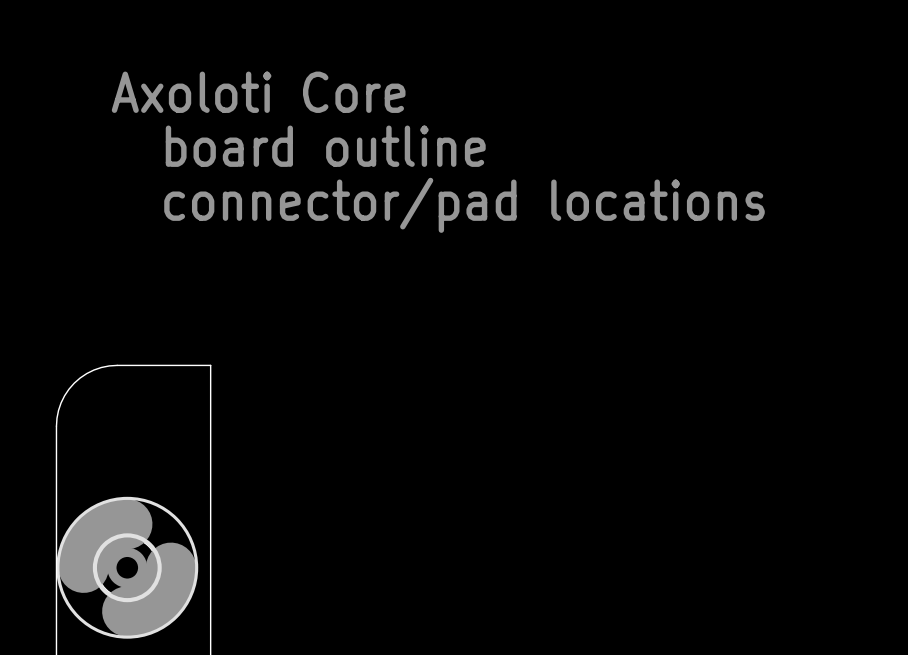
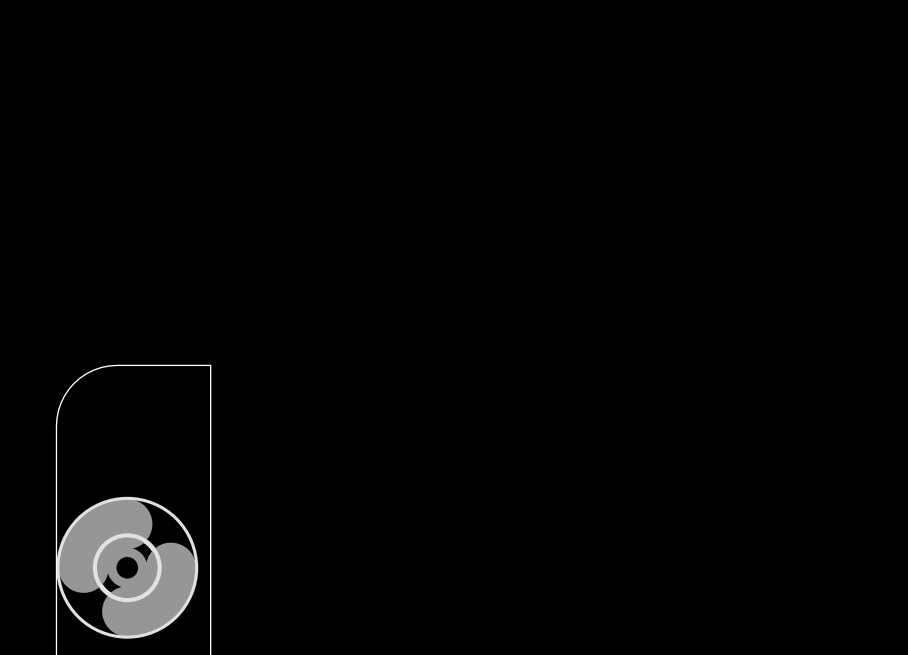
text: Axoloti Core (258, 92) -> none
text: board outline (325, 146) -> none
text: connector/pad locations (464, 205) -> none

